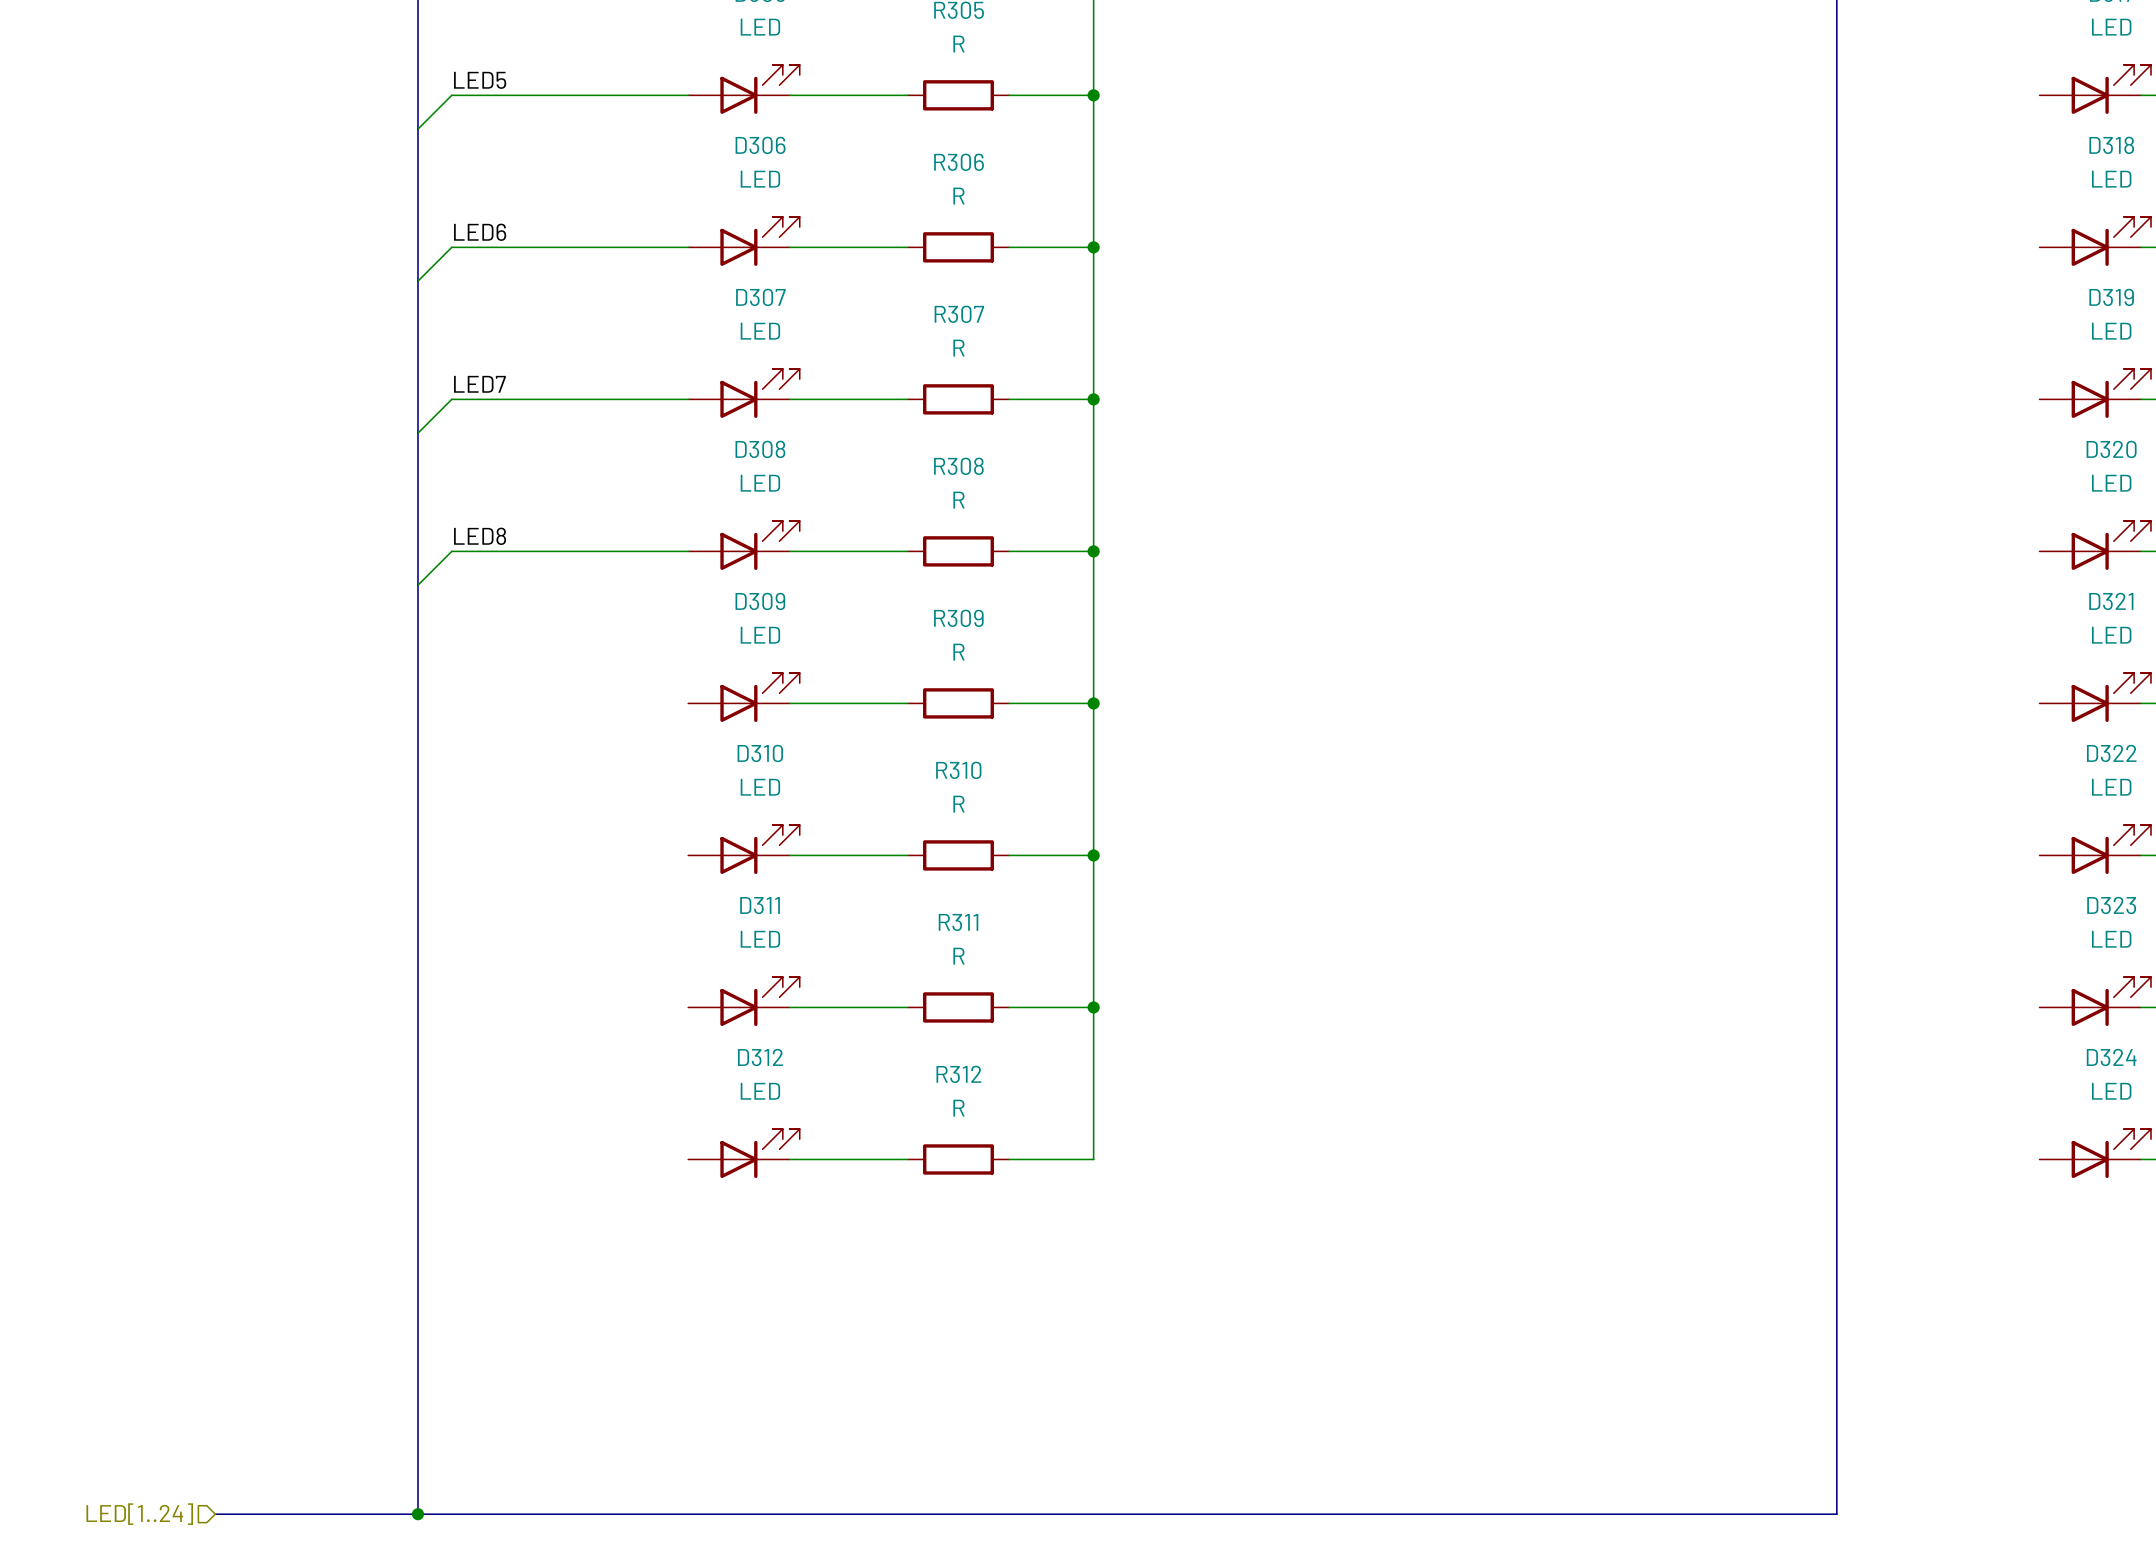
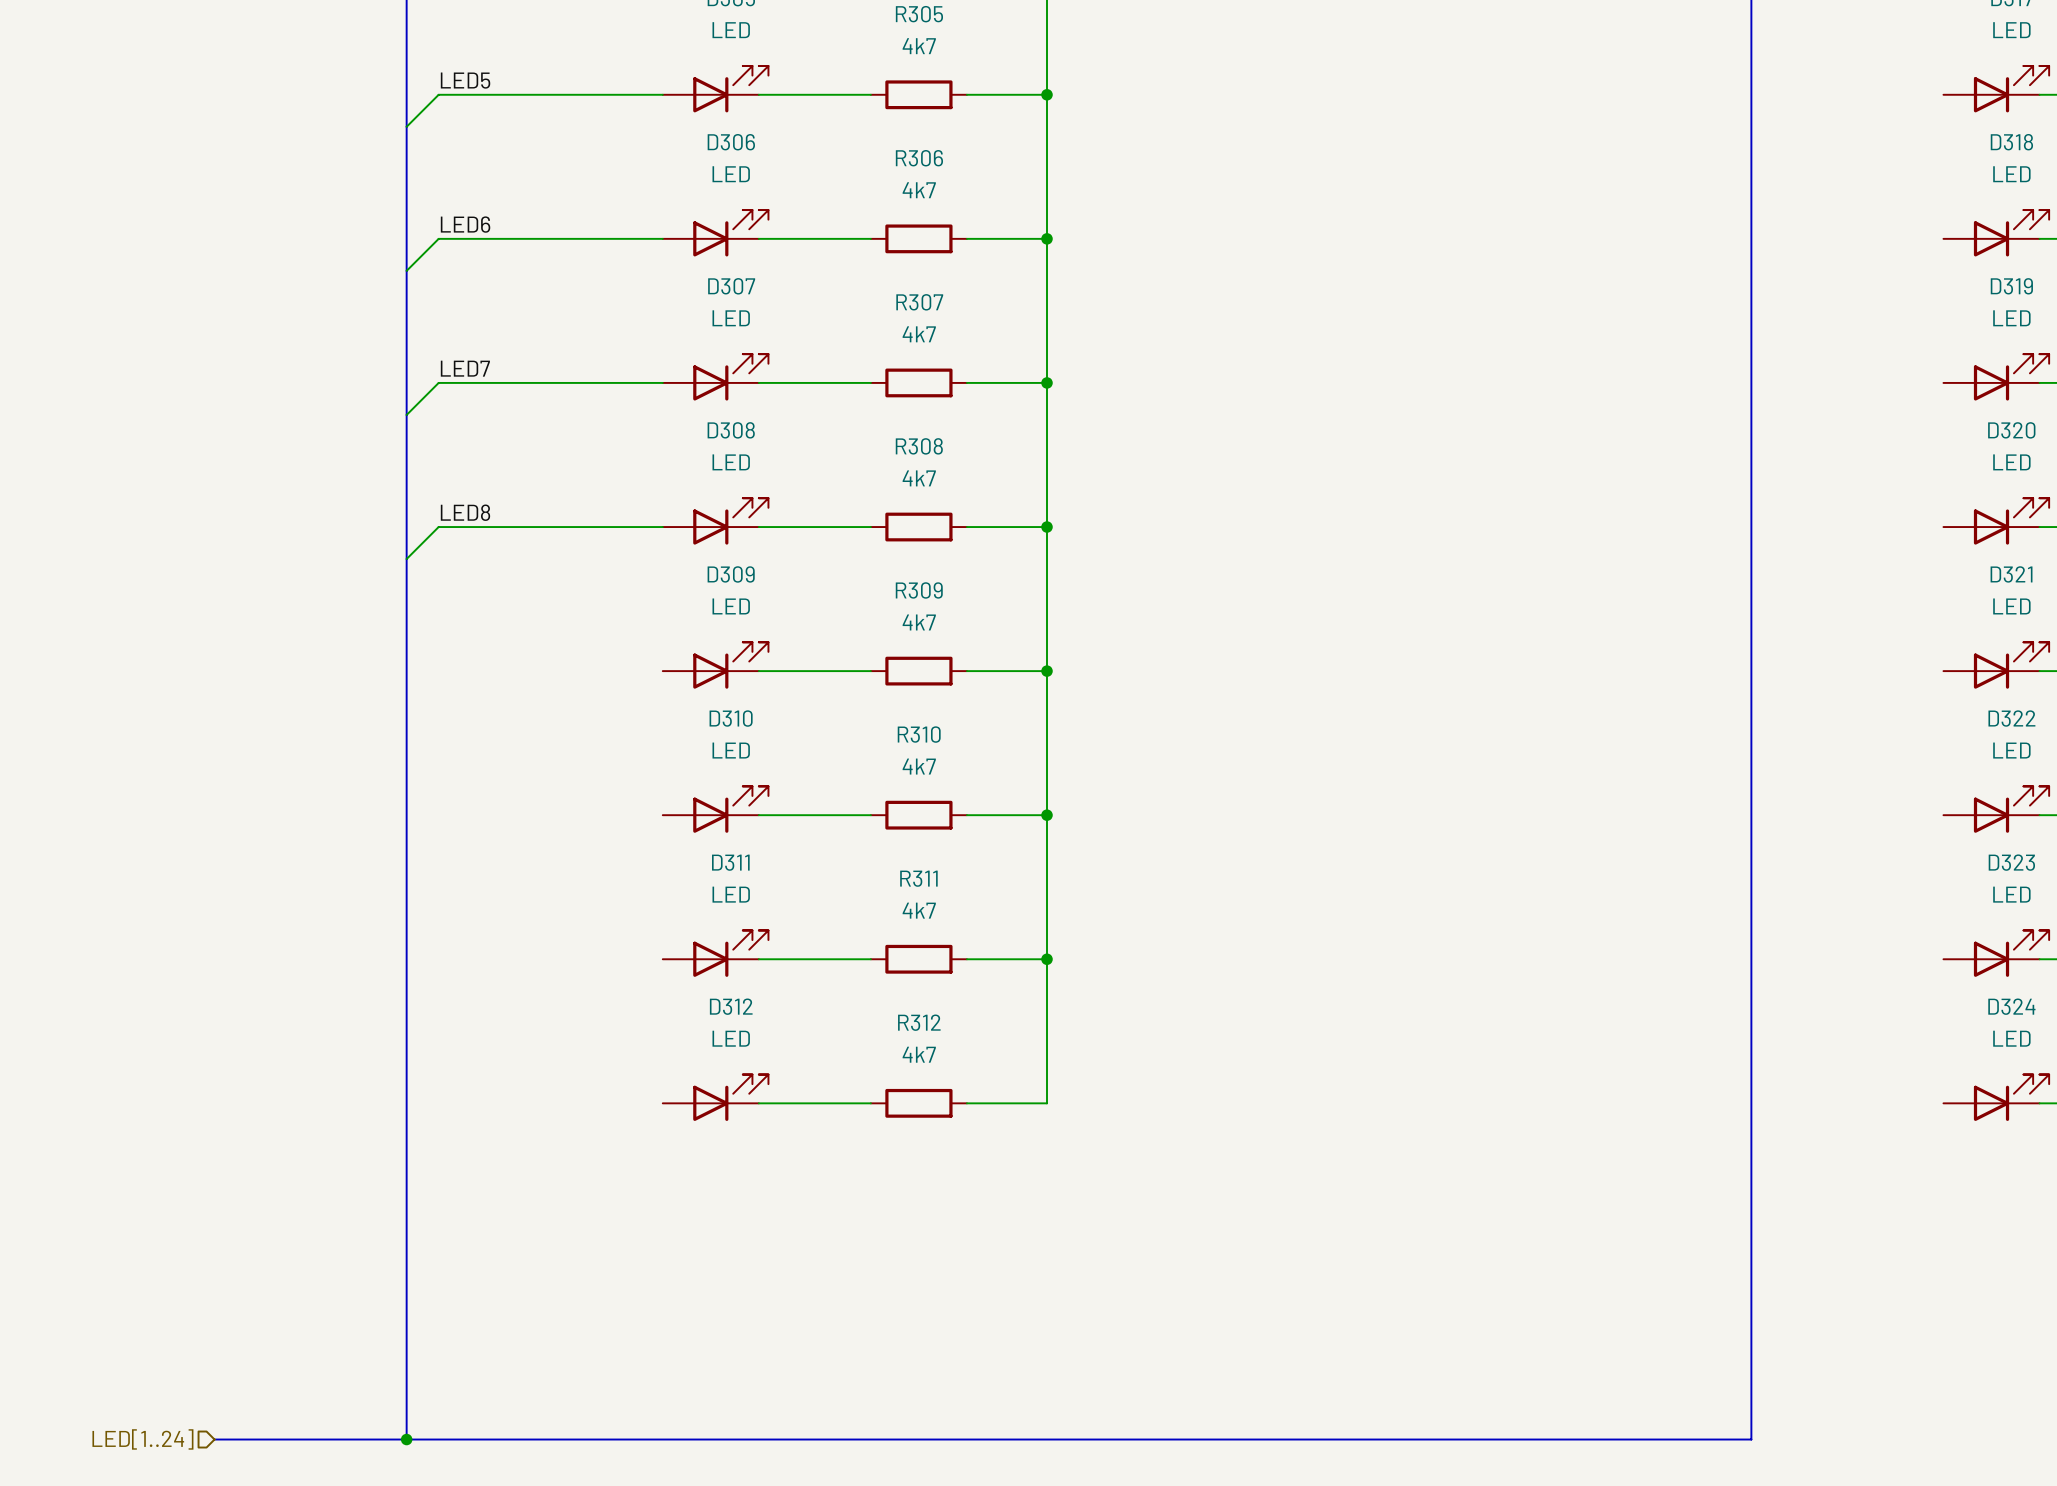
R305 value: R (959, 44) -> 4k7 (919, 46)
R306 value: R (959, 196) -> 4k7 (919, 190)
R307 value: R (959, 348) -> 4k7 (919, 334)
R308 value: R (959, 500) -> 4k7 (919, 478)
R309 value: R (959, 652) -> 4k7 (919, 622)
R310 value: R (959, 804) -> 4k7 (919, 766)
R311 value: R (959, 956) -> 4k7 (919, 910)
R312 value: R (959, 1108) -> 4k7 (919, 1054)

